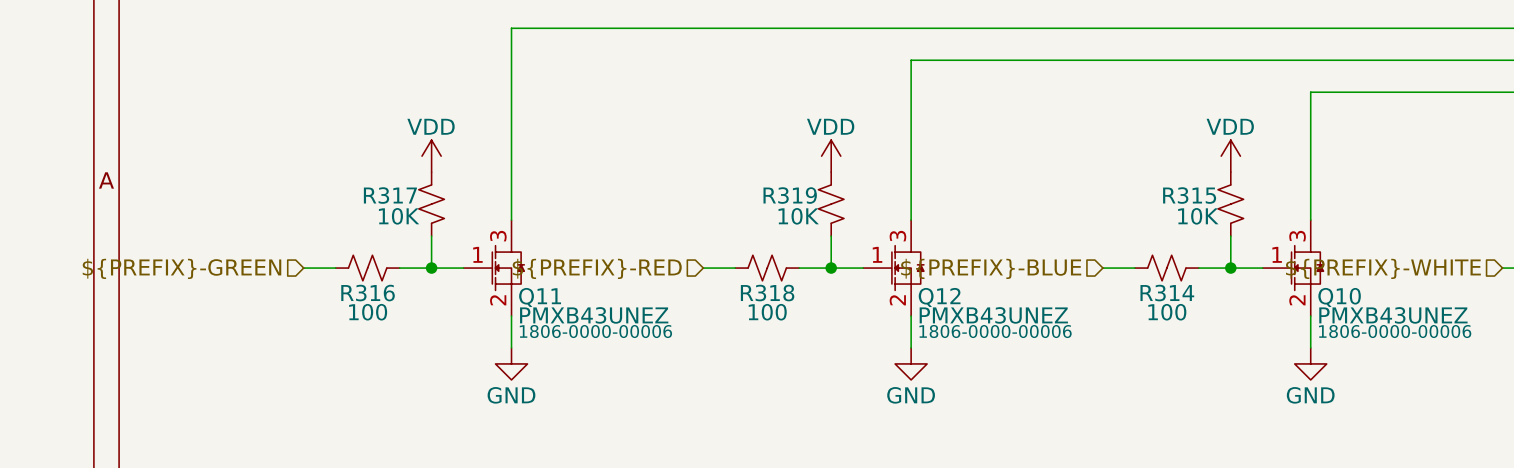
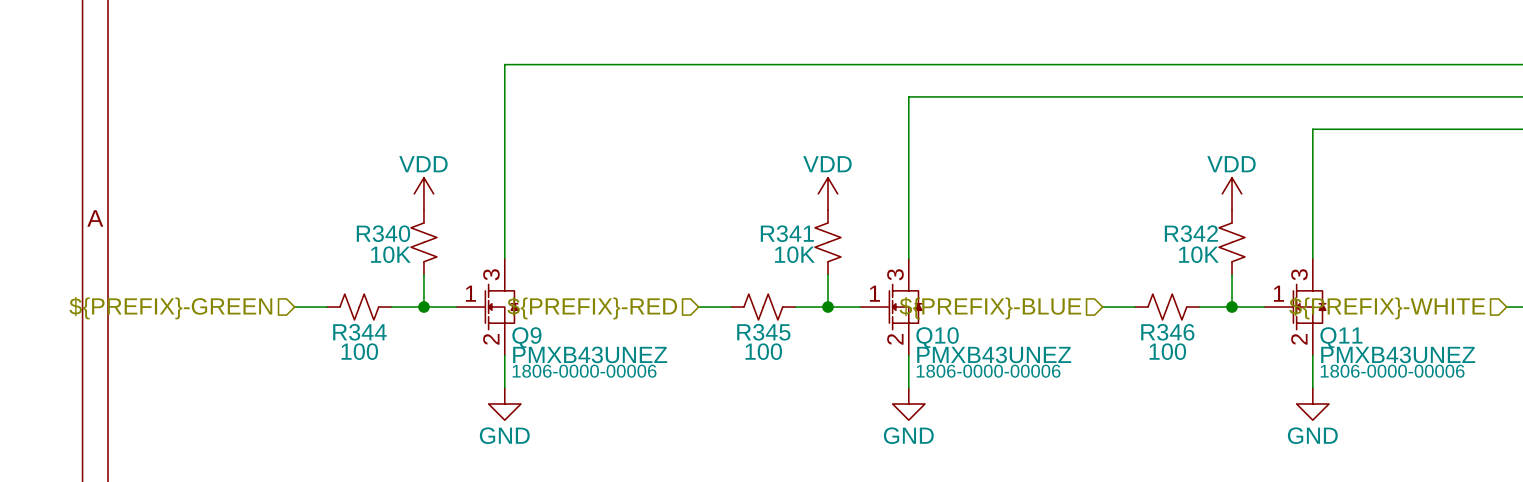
R317 name: R317 (390, 195) -> R340 (383, 233)
R319 name: R319 (790, 195) -> R341 (787, 233)
R315 name: R315 (1189, 195) -> R342 (1191, 233)
R316 name: R316 (368, 293) -> R344 (359, 332)
R318 name: R318 (767, 293) -> R345 (763, 332)
R314 name: R314 (1167, 293) -> R346 (1167, 332)
Q11 name: Q11 (540, 297) -> Q9 (526, 337)
Q12 name: Q12 (939, 297) -> Q10 (937, 337)
Q10 name: Q10 (1339, 297) -> Q11 (1341, 337)

